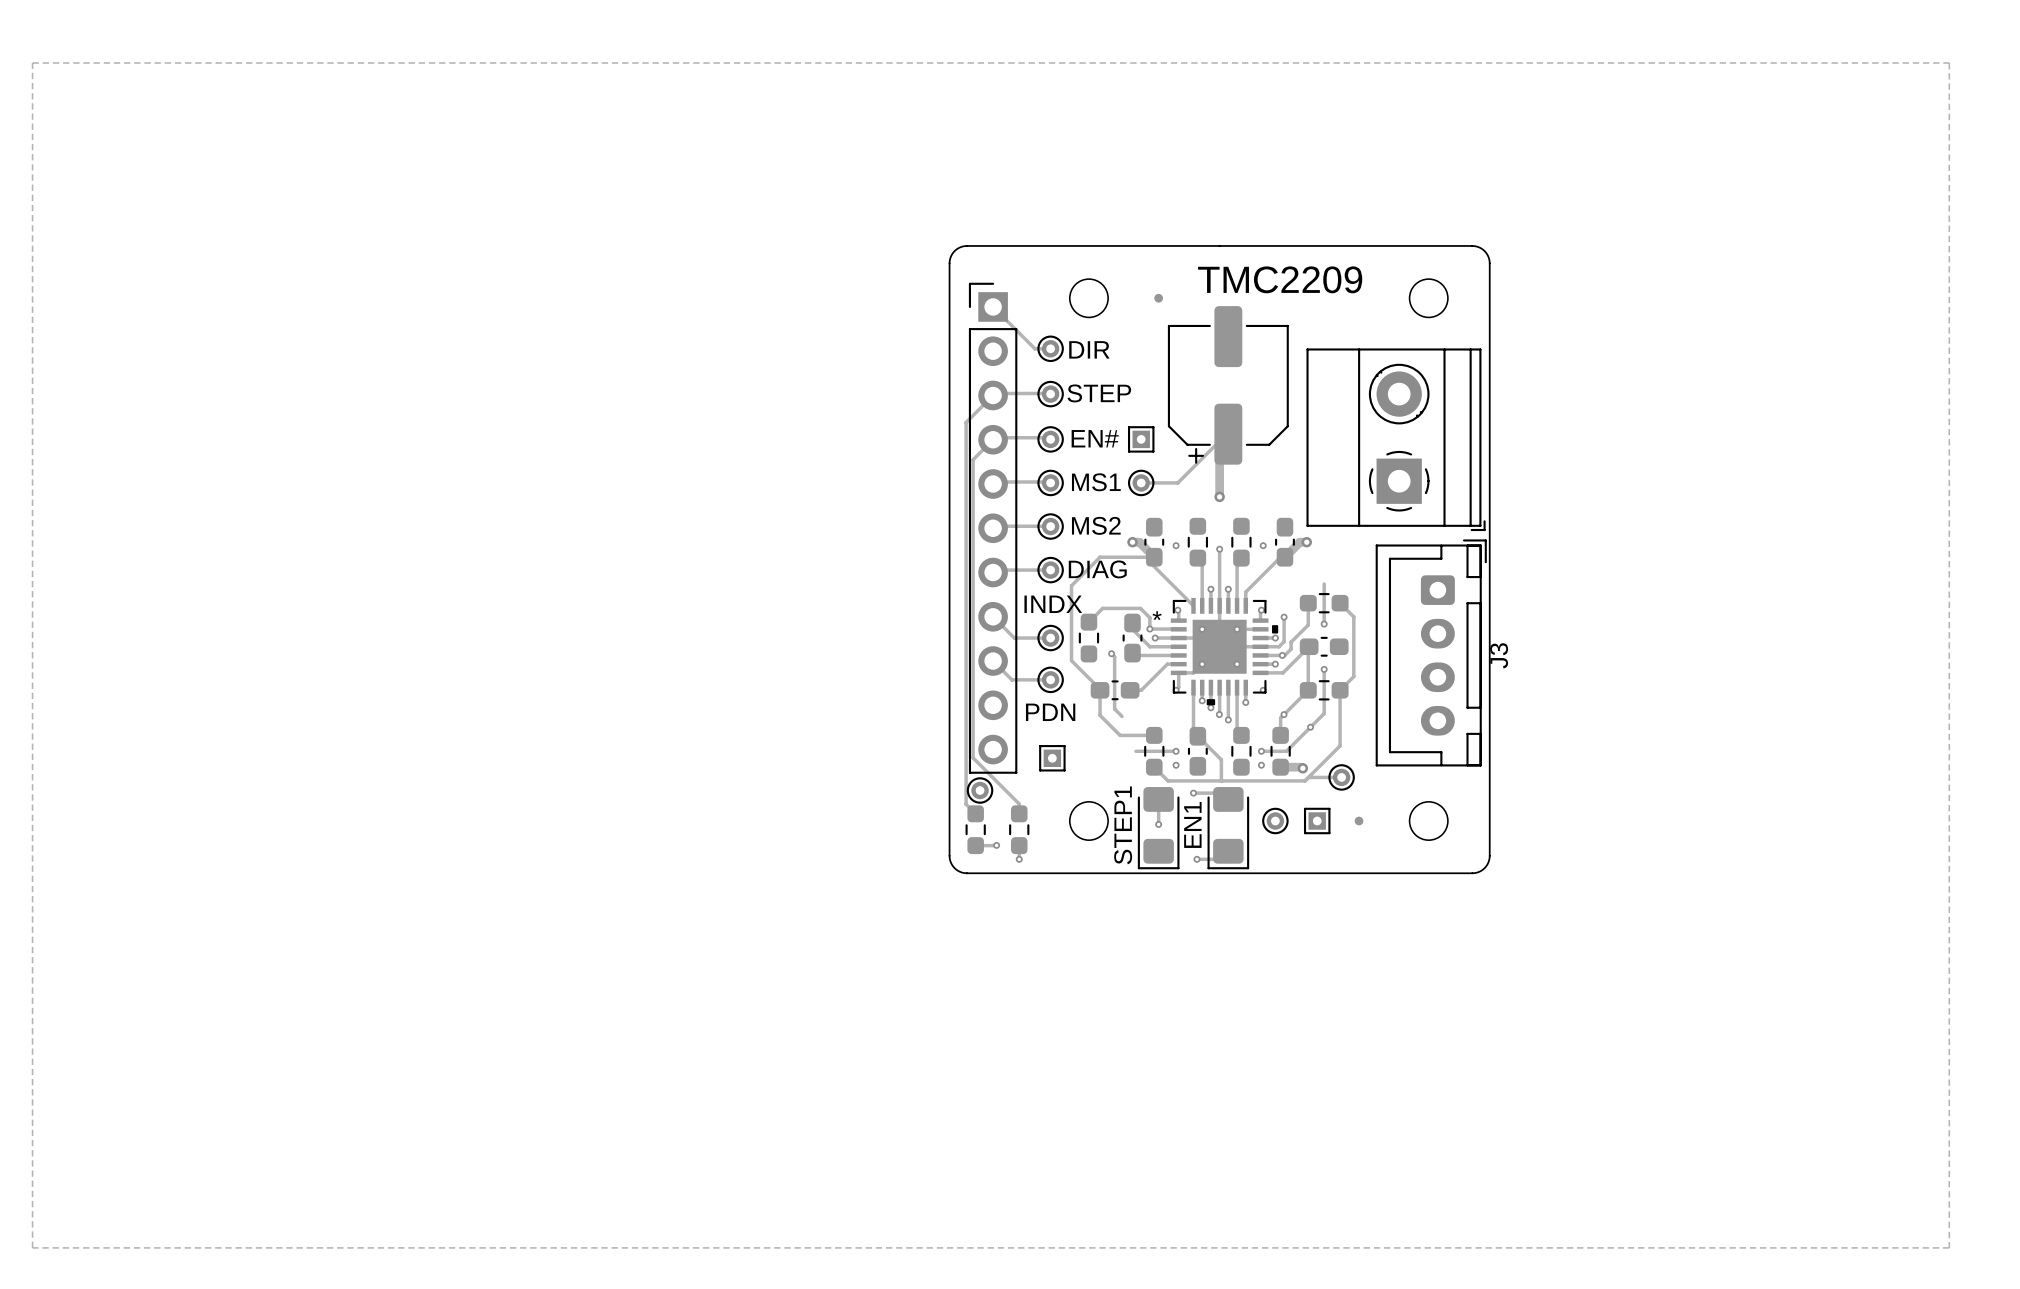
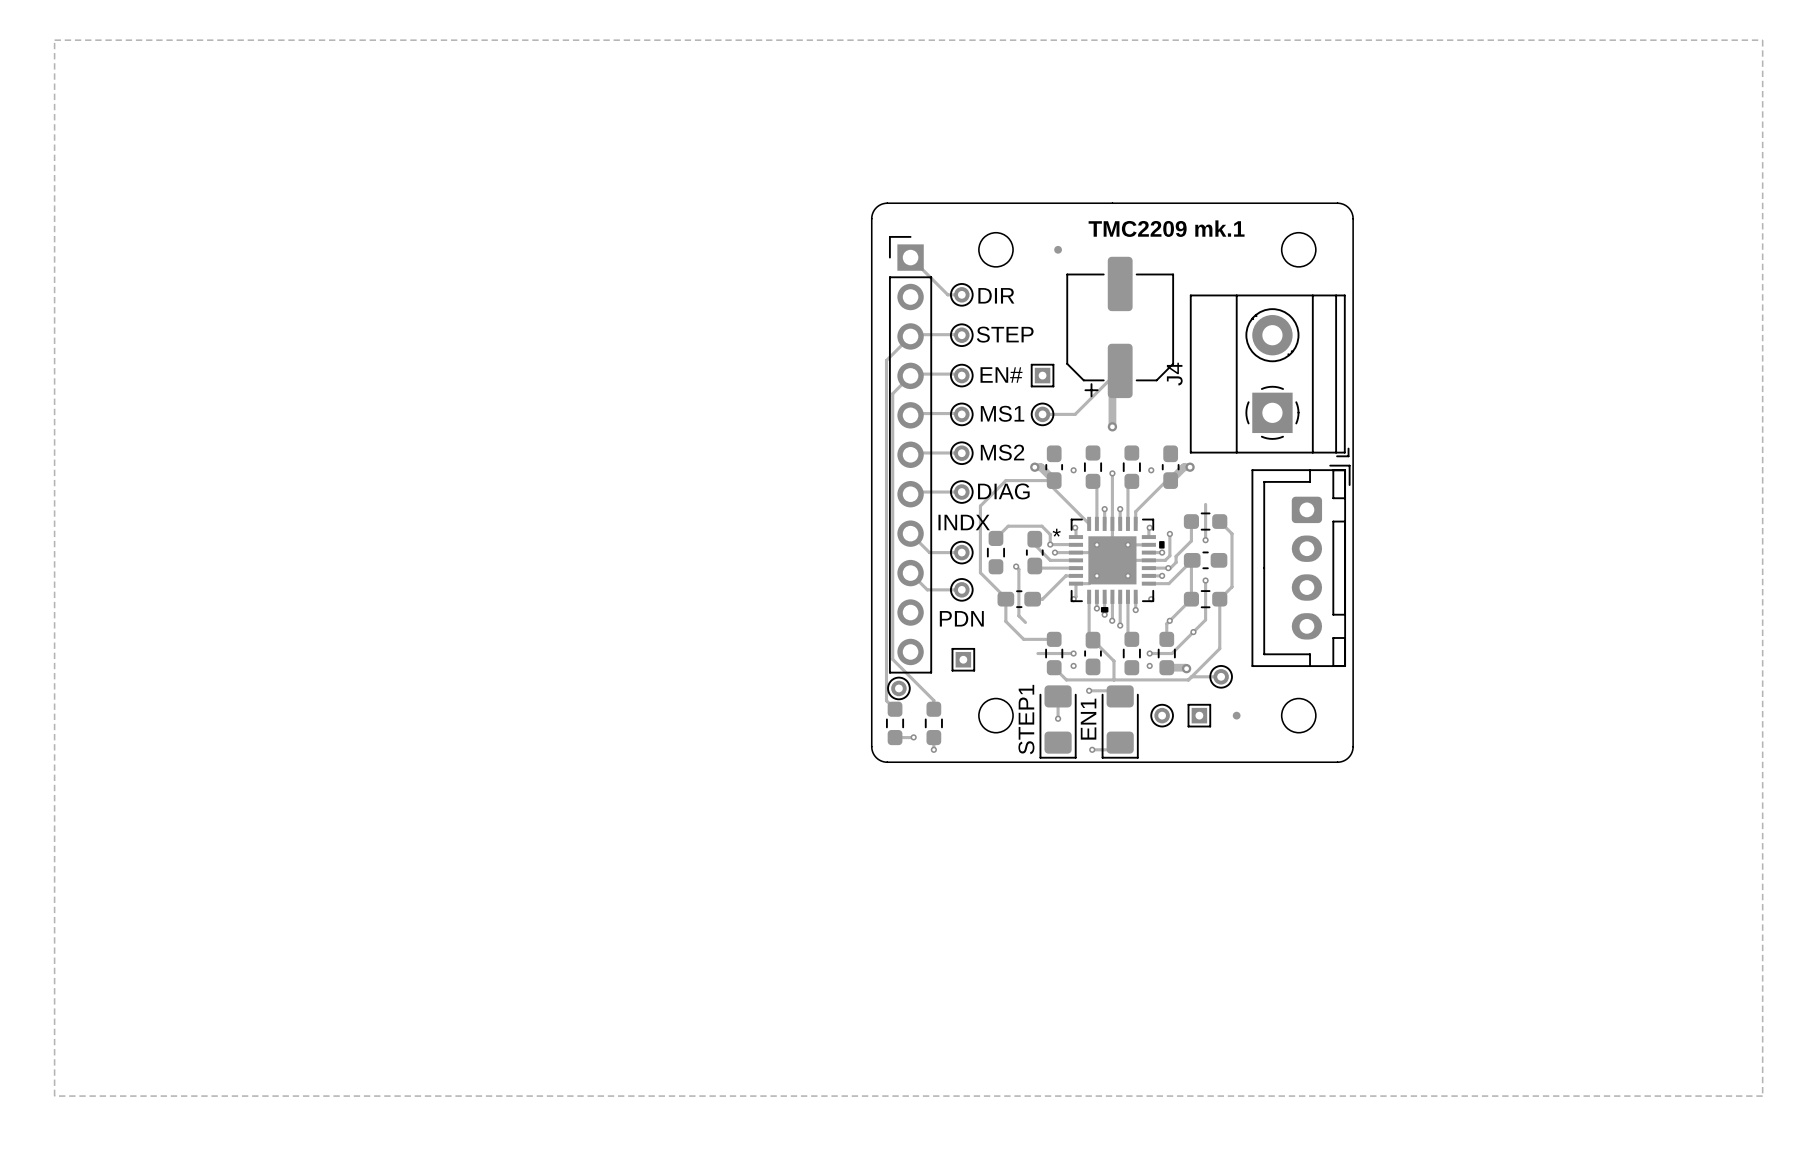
text: TMC2209 (1280, 279) -> TMC2209 mk.1 (1166, 228)
J4 name: none -> J4 (1174, 374)
J3 name: J3 (1499, 655) -> none

